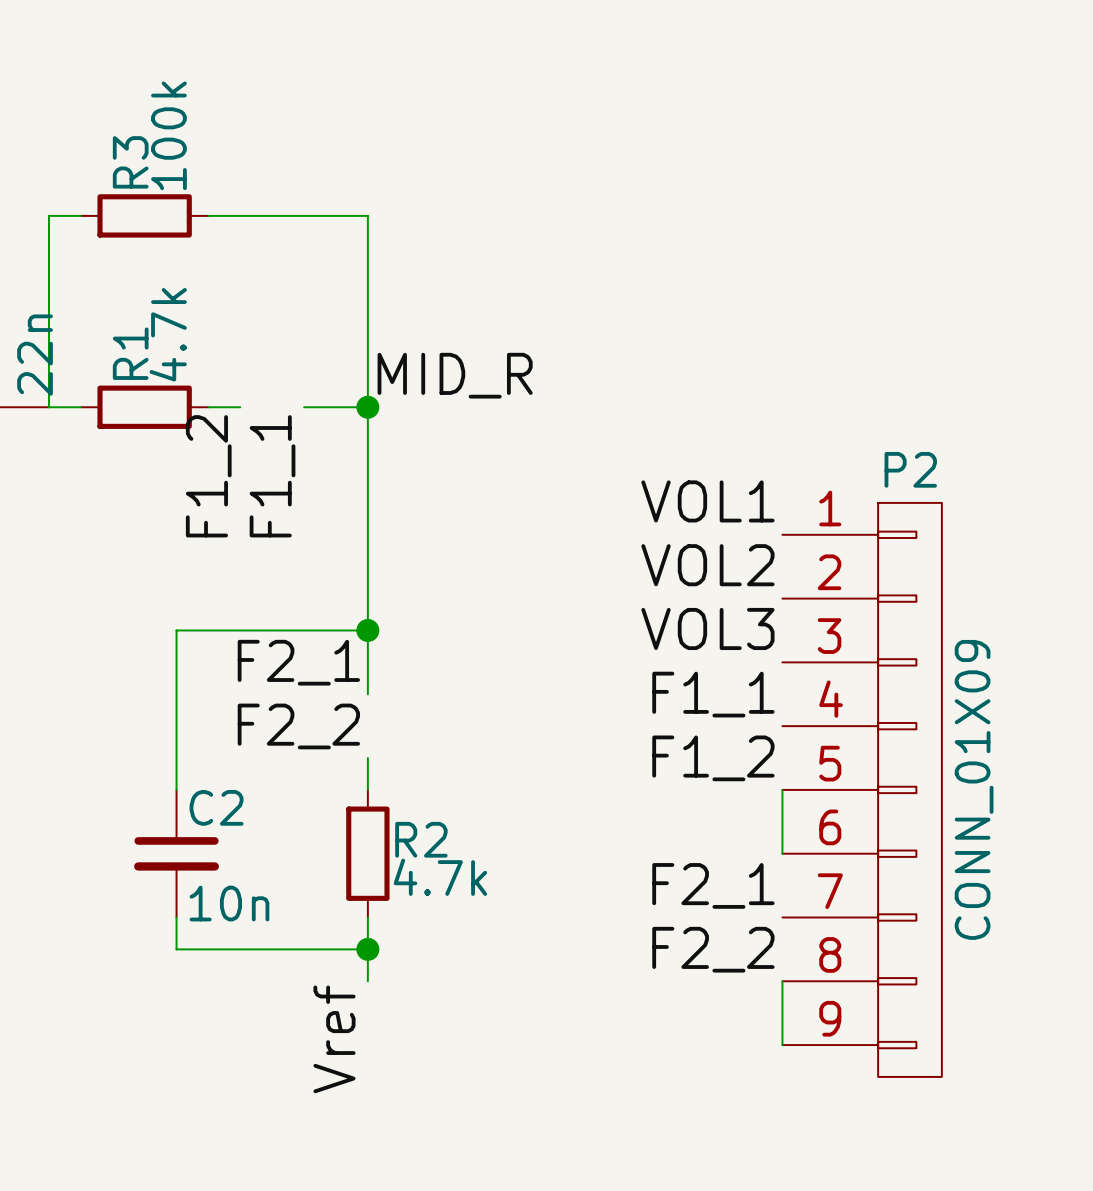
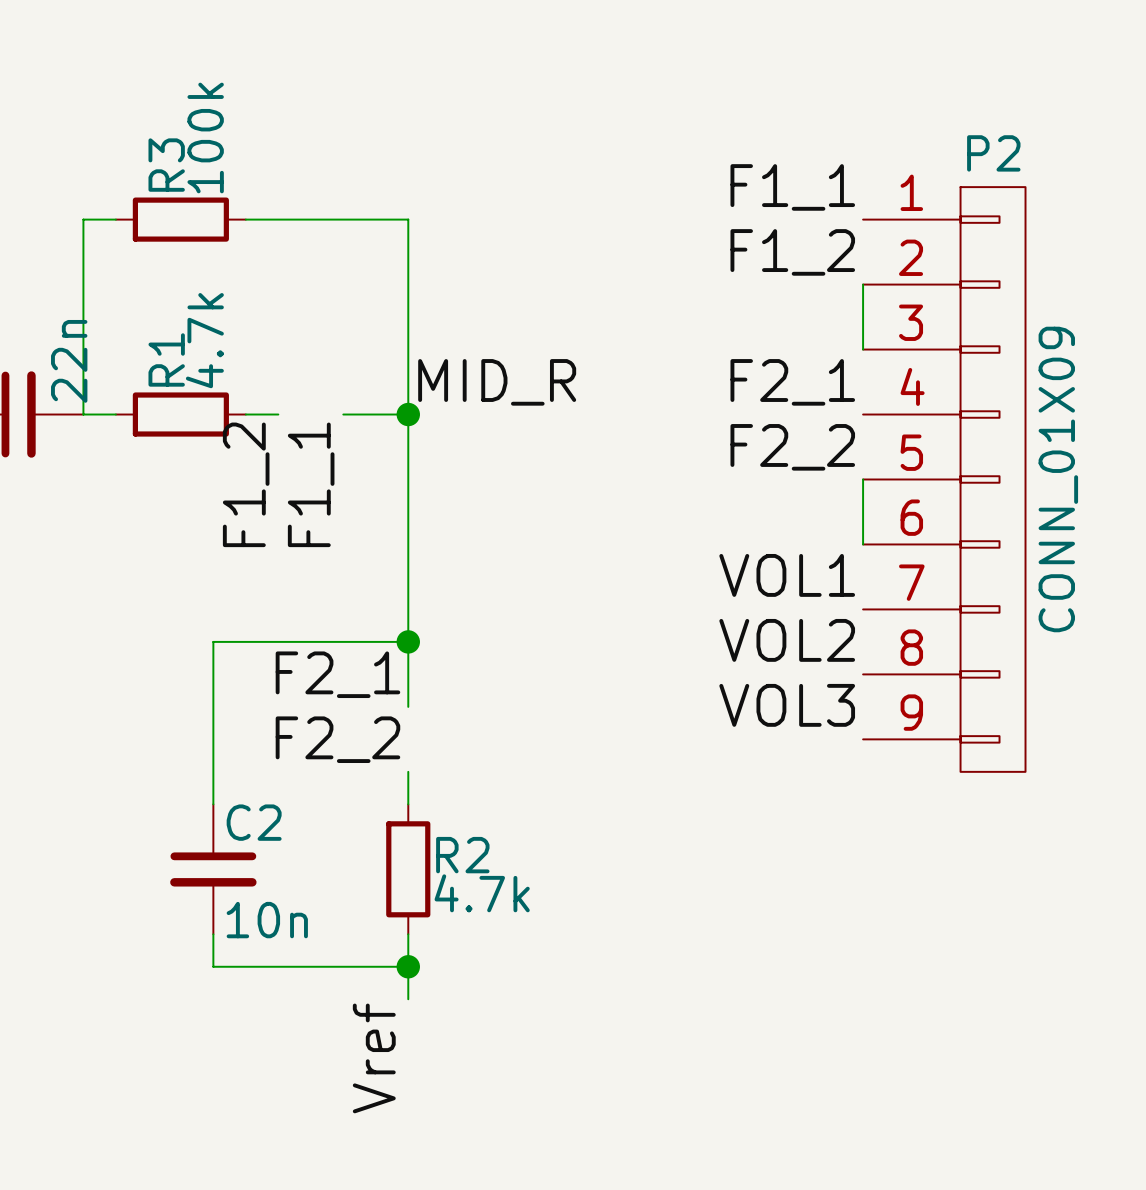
wire: none -> (863, 284) (863, 349)
label position: VOL1 (707, 501) -> VOL1 (787, 575)
label position: VOL2 (707, 565) -> VOL2 (787, 640)
label position: VOL3 (707, 628) -> VOL3 (787, 705)
label position: F1_1 (713, 694) -> F1_1 (792, 187)
label position: F1_2 (713, 758) -> F1_2 (792, 252)
wire: (782, 789) (782, 853) -> (863, 479) (863, 544)
P2 position: (862, 789) -> (944, 479)
label position: F2_1 (713, 885) -> F2_1 (792, 382)
label position: F2_2 (713, 949) -> F2_2 (792, 447)
wire: (782, 981) (782, 1045) -> none

